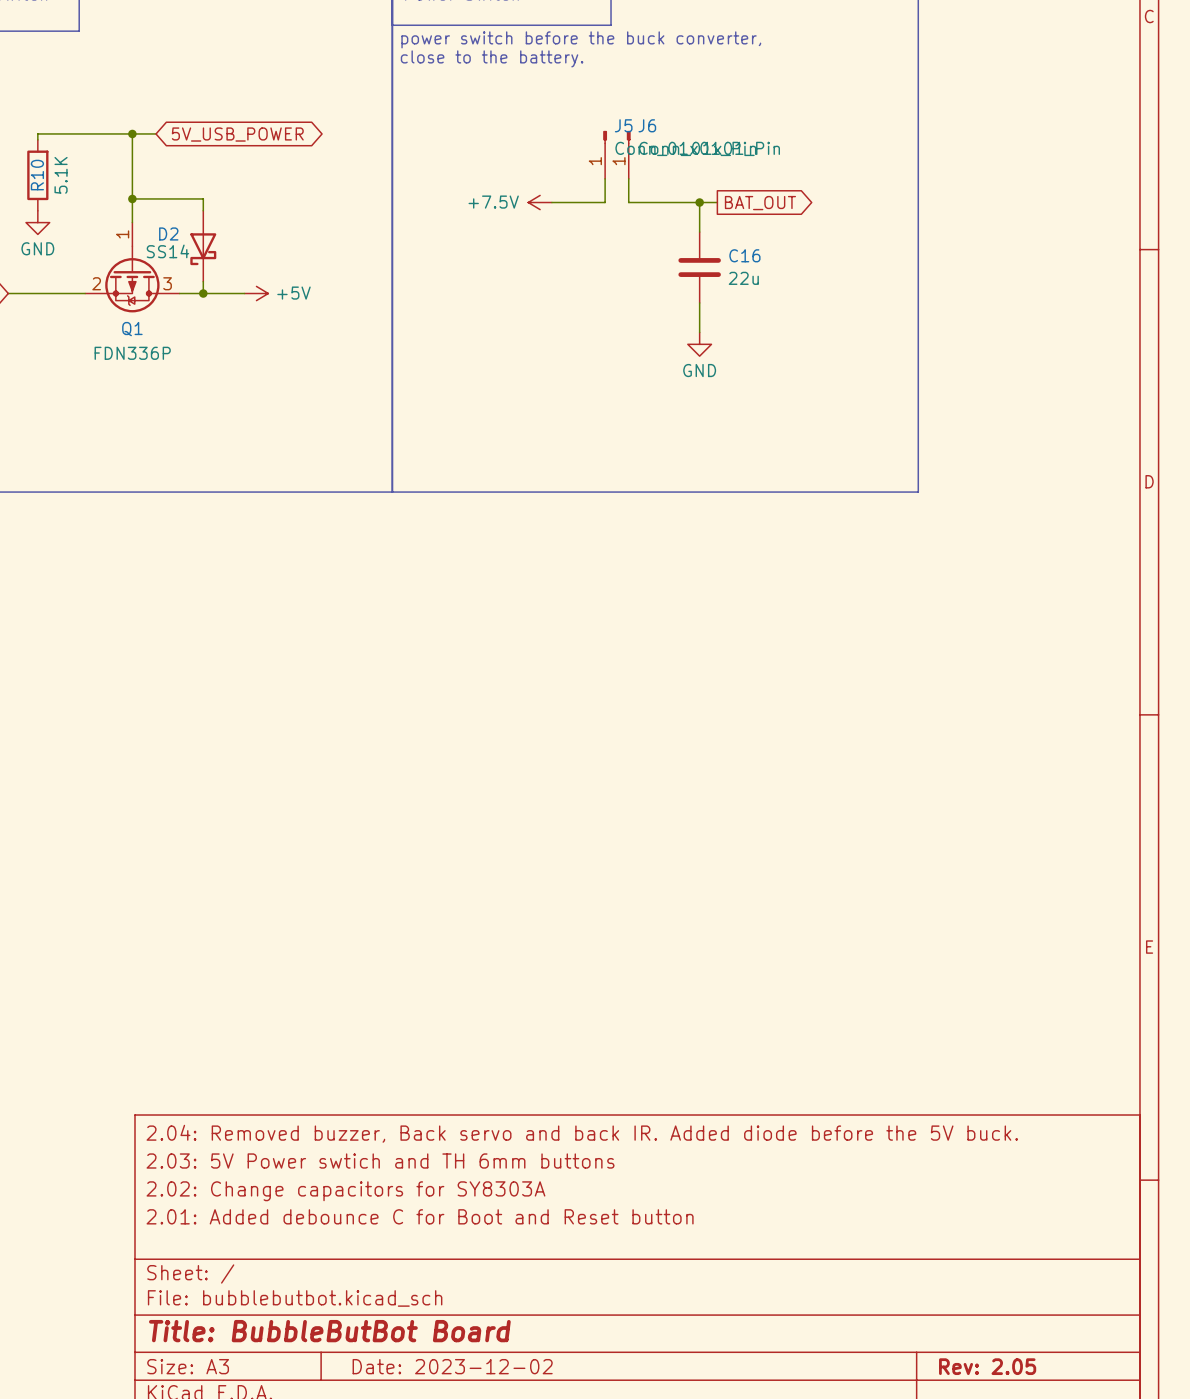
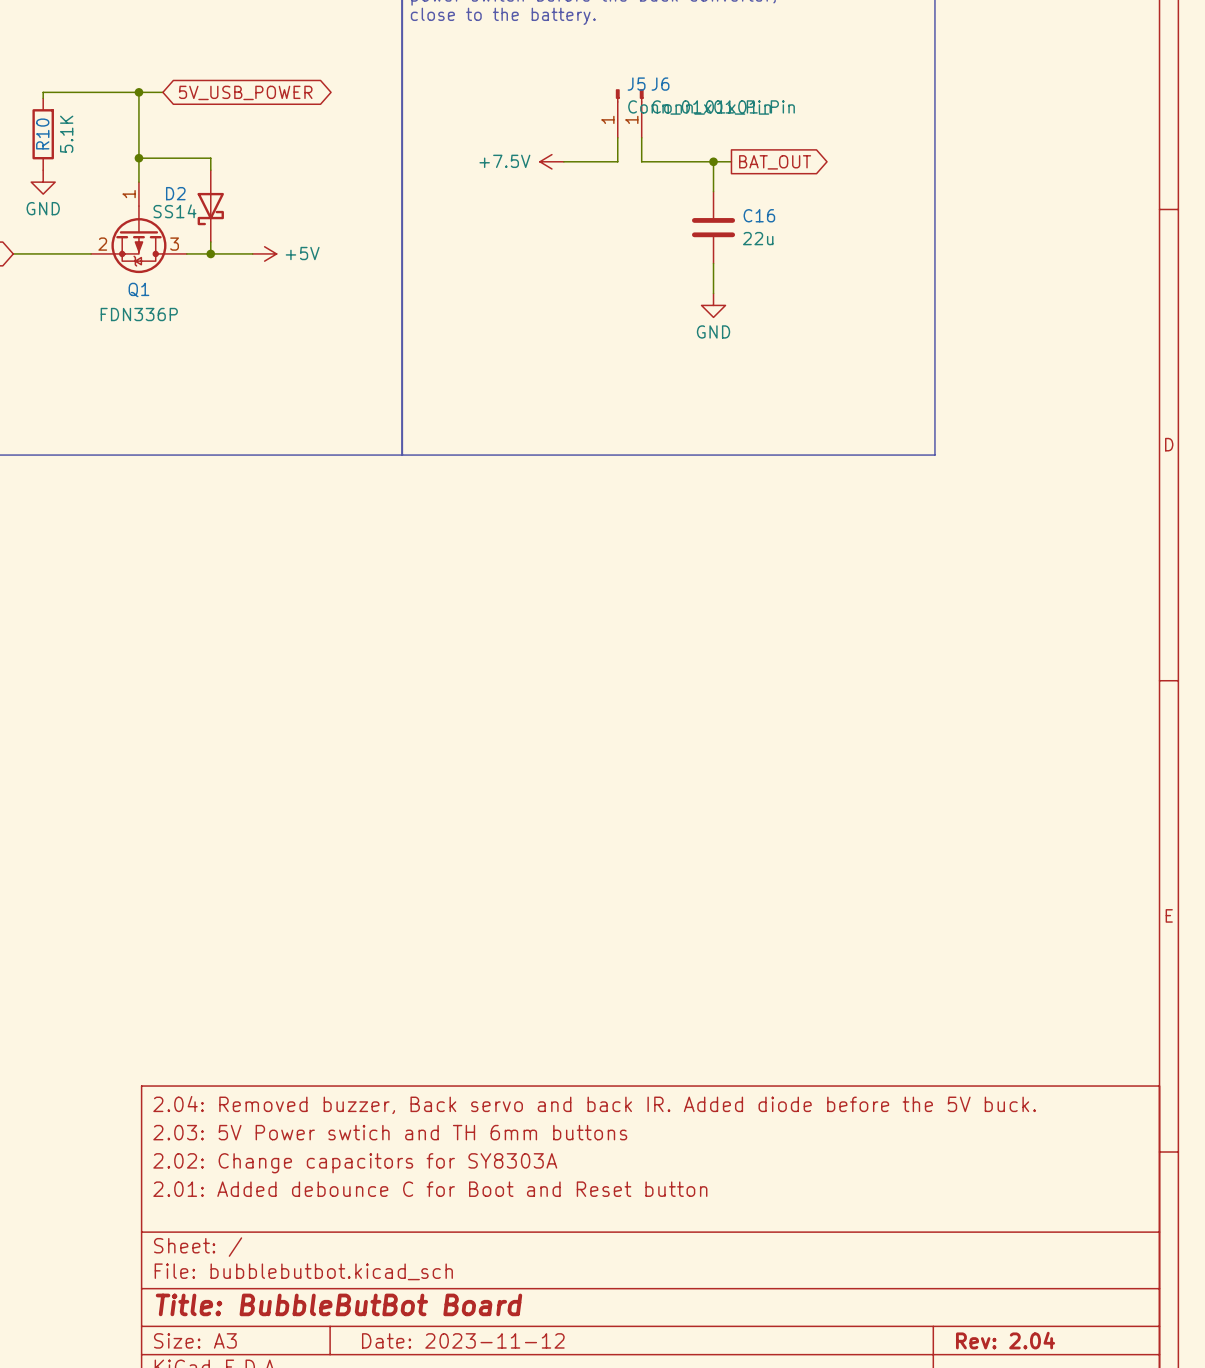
title block: Date: 2023-12-02 (452, 1366) -> Date: 2023-11-12 (463, 1340)
title block: Rev: 2.05 (987, 1366) -> Rev: 2.04 (1005, 1340)

